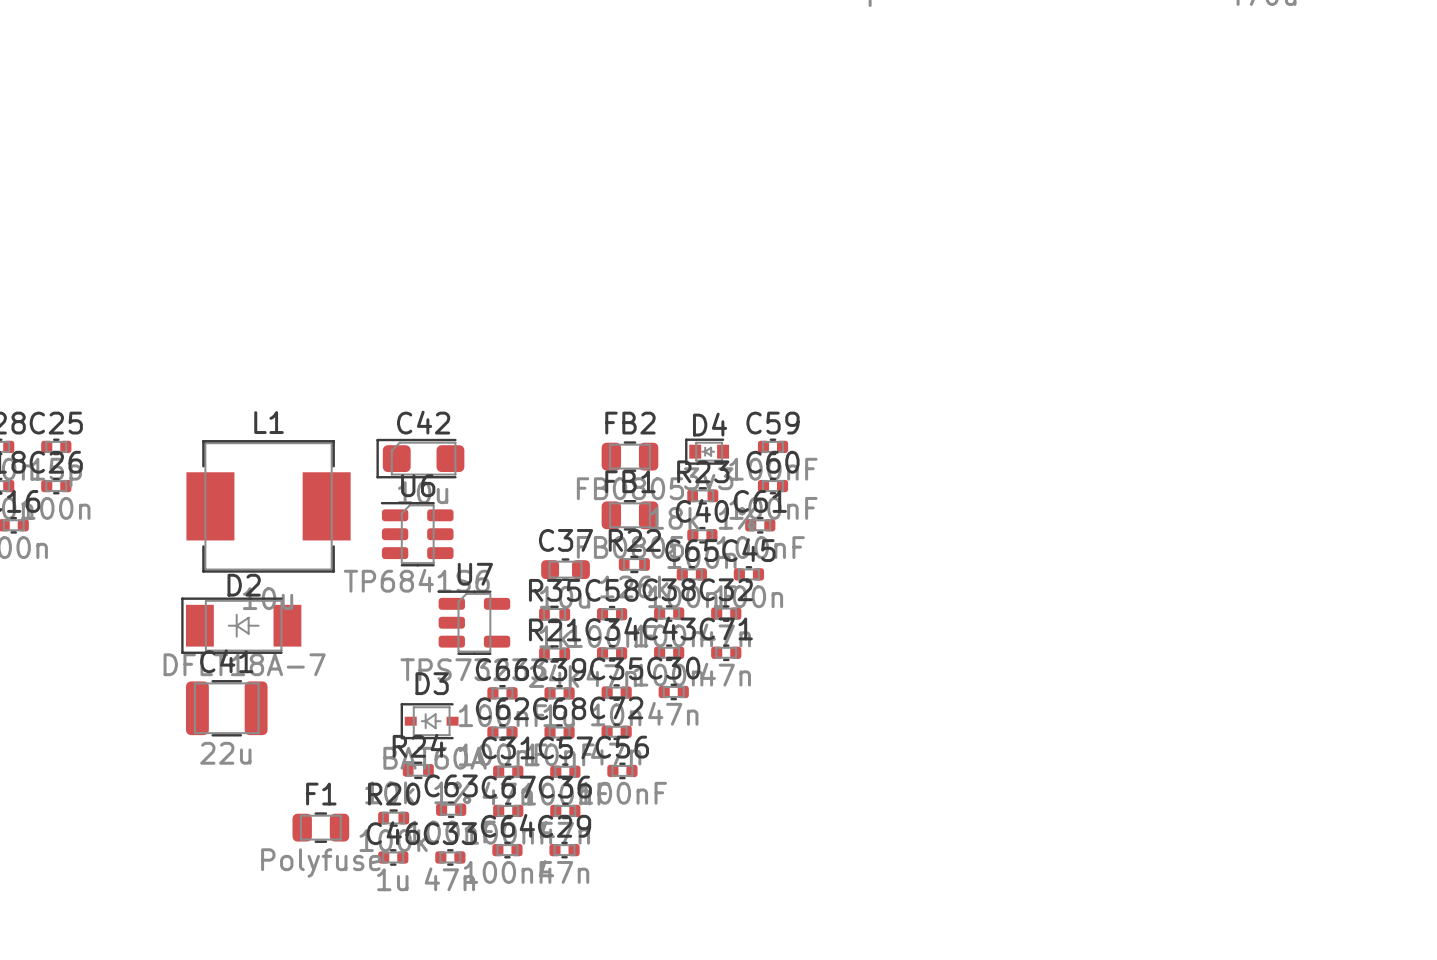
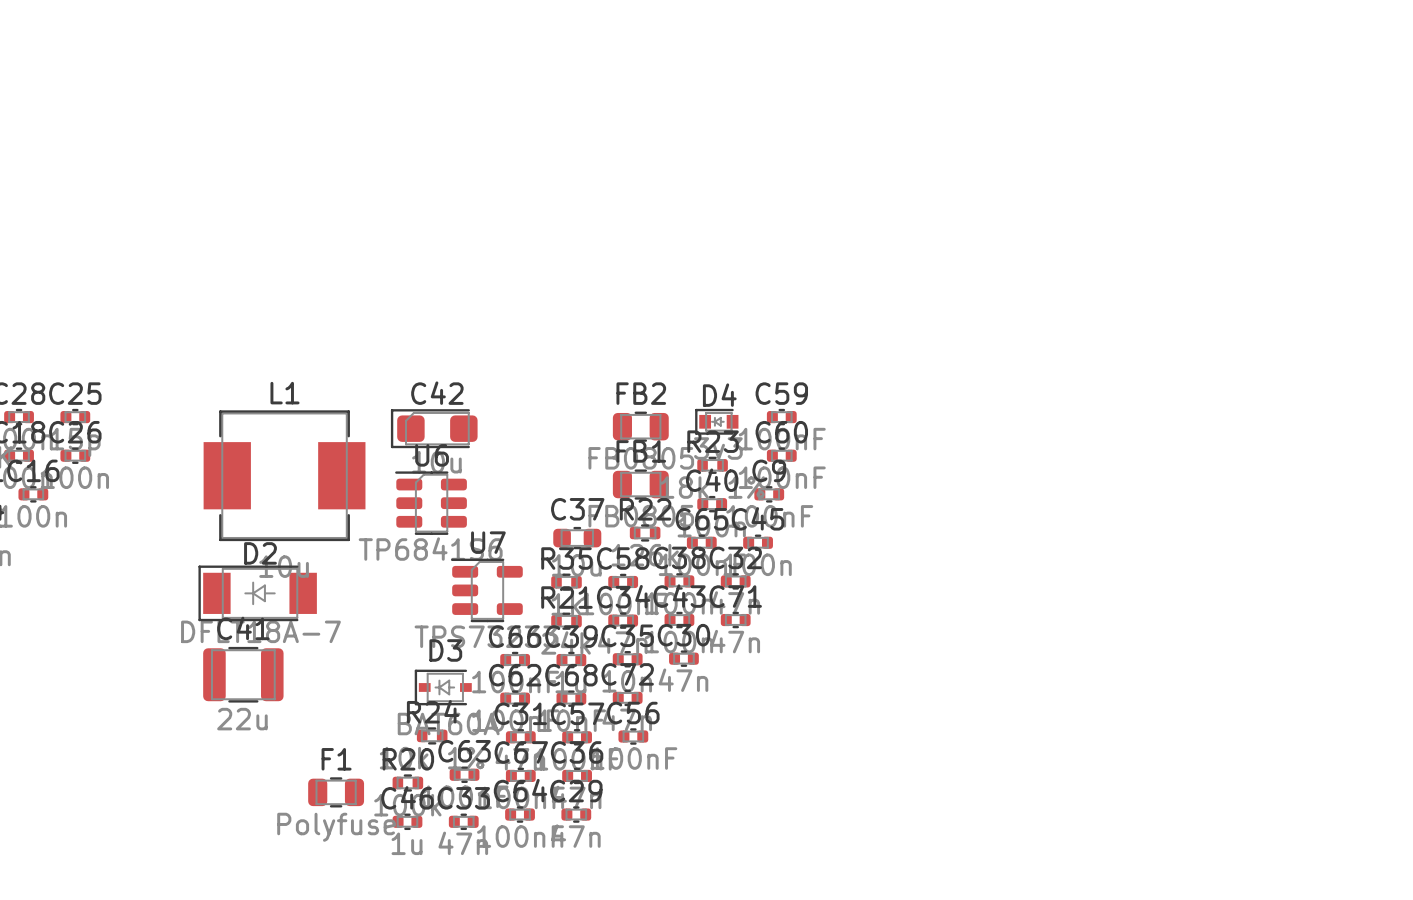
C61 name: C61 (760, 501) -> C9 (769, 470)

